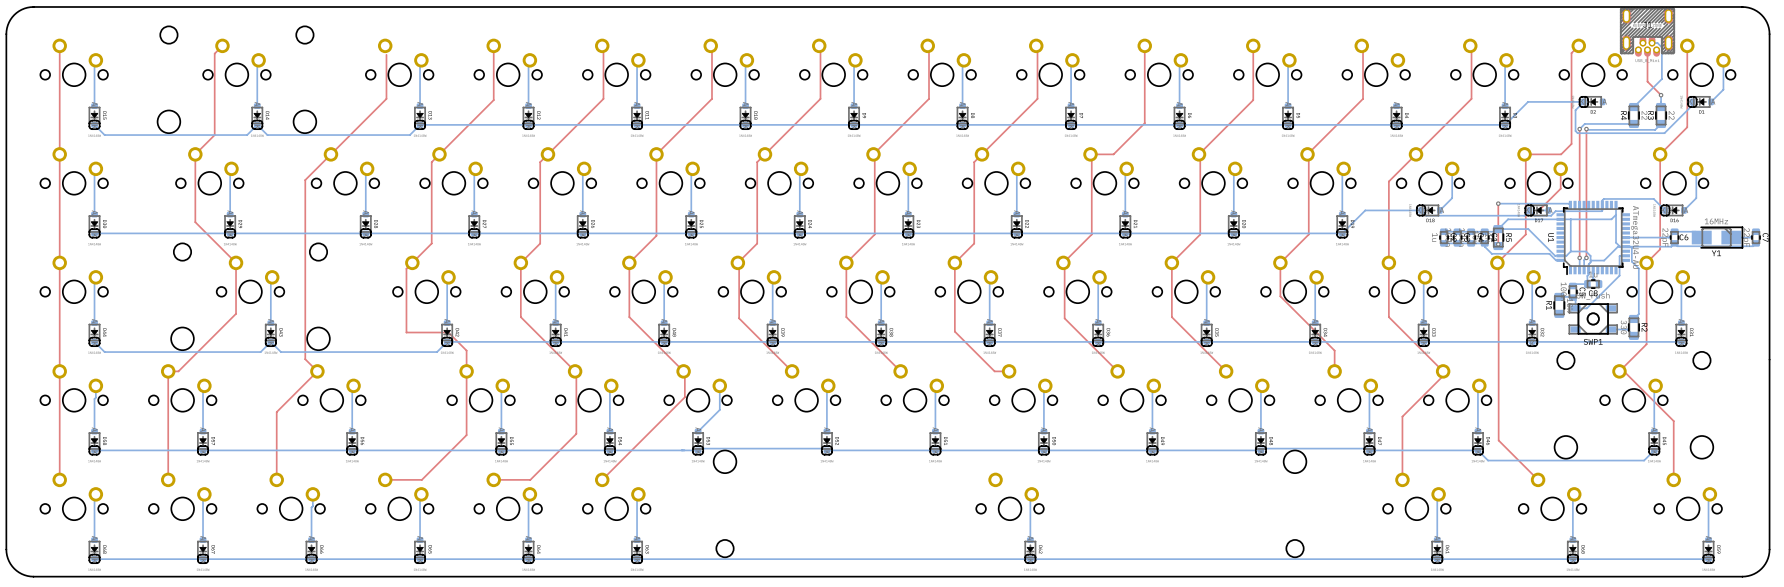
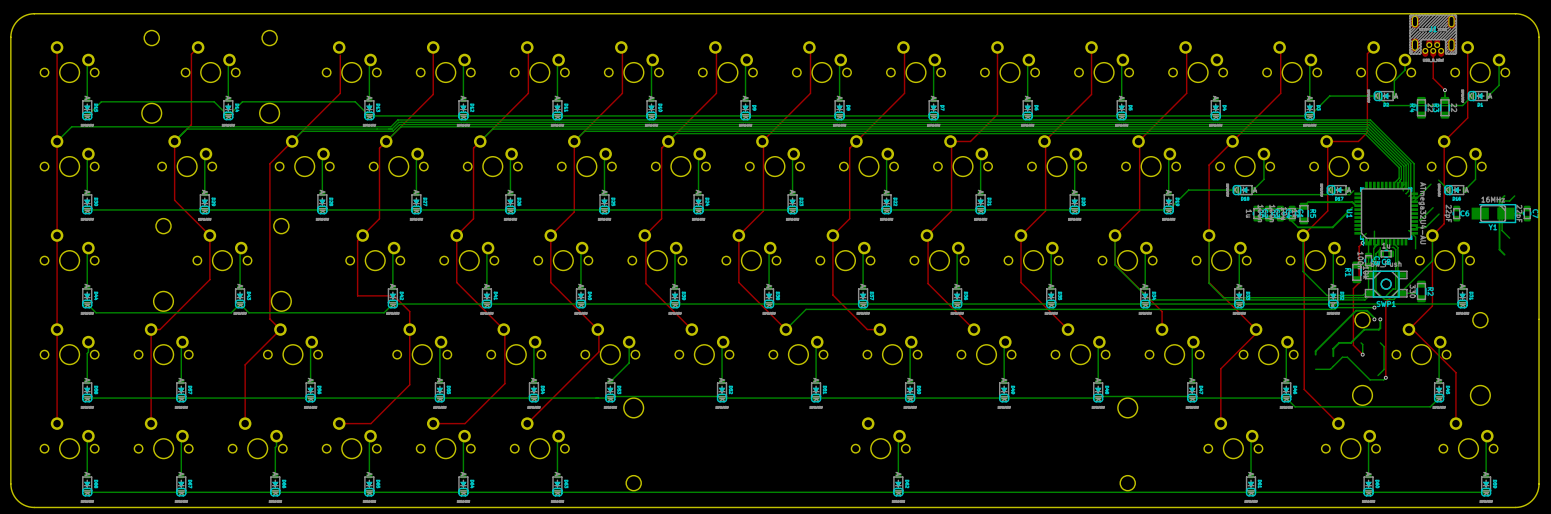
bottom track: (1652, 43) (1657, 43) (1661, 47) (1661, 79) (1633, 107) -> none
bottom track: none -> (1405, 59) (1405, 70) (1394, 80) (1394, 96)
bottom track: (1583, 101) (1575, 110) (1575, 131) (1577, 133) (1664, 133) (1692, 105) -> (1378, 96) (1387, 105) (1462, 105) (1472, 96)
bottom track: (1633, 123) (1584, 123) (1579, 129) -> none
bottom track: (1661, 123) (1655, 129) (1586, 129) -> none
bottom track: (420, 124) (409, 135) (267, 135) (257, 124) (247, 135) (104, 135) (94, 124) -> (369, 115) (355, 101) (242, 101) (228, 115) (214, 101) (101, 101) (87, 115)
top track: (1579, 129) (1579, 257) -> none
via: (1579, 129) -> none
top track: (1586, 129) (1586, 257) -> none
via: (1586, 129) -> none
bottom track: none -> (57, 141) (71, 126) (391, 126) (397, 120) (1370, 120) (1414, 163) (1414, 196) (1411, 199)
bottom track: none -> (174, 141) (187, 129) (391, 129) (398, 122) (1369, 122) (1410, 163) (1411, 194) (1408, 196)
bottom track: none -> (292, 141) (302, 131) (392, 131) (399, 124) (1368, 124) (1408, 164) (1408, 191) (1406, 193)
bottom track: none -> (386, 141) (400, 126) (1367, 126) (1406, 165) (1406, 186) (1403, 190)
bottom track: none -> (480, 141) (492, 129) (1366, 129) (1403, 166) (1403, 184) (1400, 188)
bottom track: none -> (574, 141) (584, 131) (1365, 131) (1401, 166) (1401, 179) (1397, 185)
bottom track: none -> (668, 141) (676, 133) (1365, 133) (1399, 167) (1399, 178) (1394, 182)
top track: (1560, 168) (1560, 188) (1538, 210) -> none
bottom track: (1653, 198) (1603, 198) (1601, 211) (1555, 211) -> none
bottom track: (1498, 203) (1570, 205) -> none
top track: (1498, 203) (1498, 244) -> none
via: (1498, 203) -> none
bottom track: none -> (1430, 184) (1414, 202)
bottom track: (1616, 205) (1616, 242) (1620, 246) -> none
bottom track: (1616, 214) (1611, 219) (1508, 219) (1503, 224) -> (1355, 204) (1352, 202) (1308, 202)
bottom track: none -> (1504, 195) (1499, 200) (1499, 249) (1504, 254)
bottom track: none -> (1514, 195) (1509, 201) (1502, 202) (1502, 230) (1509, 238)
bottom track: (1570, 219) (1570, 251) -> none
bottom track: (1498, 229) (1528, 229) (1555, 255) (1566, 255) (1570, 251) -> none
bottom track: none -> (1433, 207) (1420, 219)
bottom track: (1701, 237) (1695, 231) (1674, 231) (1668, 237) (1625, 237) -> none
bottom track: none -> (1439, 214) (1425, 227) (1416, 227) (1414, 225)
bottom track: (1755, 243) (1753, 246) (1677, 246) (1674, 243) (1671, 246) (1618, 246) (1604, 260) (1590, 260) -> none
via: (1498, 244) -> none
bottom track: (1630, 246) (1631, 261) (1638, 268) (1638, 314) (1633, 318) -> none
bottom track: (1570, 251) (1586, 251) (1590, 255) (1587, 284) (1574, 284) (1572, 285) -> none
bottom track: (1491, 253) (1549, 253) (1556, 260) (1560, 260) -> (1298, 227) (1332, 227) (1352, 207)
bottom track: (1625, 255) (1619, 256) (1619, 275) (1586, 308) (1575, 308) -> none
via: (1579, 257) -> none
bottom track: (1586, 257) (1584, 260) (1584, 270) -> none
via: (1586, 257) -> none
bottom track: none -> (1408, 230) (1415, 237) (1415, 248)
bottom track: none -> (1366, 233) (1362, 237) (1362, 242)
bottom track: none -> (1115, 235) (1115, 265) (1149, 299) (1364, 299) (1373, 291) (1373, 248) (1377, 244) (1374, 246)
bottom track: none -> (1209, 235) (1209, 283) (1223, 297) (1364, 297) (1370, 290)
bottom track: none -> (1303, 235) (1303, 271) (1327, 295) (1363, 295) (1368, 289) (1368, 242) (1371, 239)
bottom track: none -> (1432, 235) (1432, 260) (1393, 299) (1384, 299) (1375, 290) (1375, 253) (1380, 247)
top track: none -> (1362, 242) (1359, 246) (1359, 282) (1353, 288) (1353, 345) (1362, 354)
via: none -> (1362, 242)
bottom track: none -> (1394, 244) (1397, 247) (1397, 289) (1392, 295)
bottom track: none -> (1392, 247) (1395, 249) (1395, 289) (1393, 289) (1386, 295)
top track: none -> (1392, 295) (1385, 302) (1385, 377)
bottom track: none -> (1374, 307) (1336, 307) (1334, 309) (806, 309) (785, 329)
via: none -> (1374, 307)
bottom track: none -> (1374, 319) (1367, 310) (1356, 310) (1315, 351) (1315, 354)
via: none -> (1374, 319)
bottom track: none -> (1380, 319) (1378, 329) (1364, 329) (1350, 342) (1339, 342) (1333, 348) (1333, 356)
via: none -> (1380, 319)
bottom track: none -> (1361, 342) (1362, 354)
bottom track: none -> (1380, 342) (1384, 346) (1384, 369) (1378, 375)
via: none -> (1362, 354)
bottom track: none -> (1315, 369) (1330, 369) (1342, 357) (1347, 357) (1369, 379) (1383, 379) (1386, 377)
via: none -> (1385, 377)

